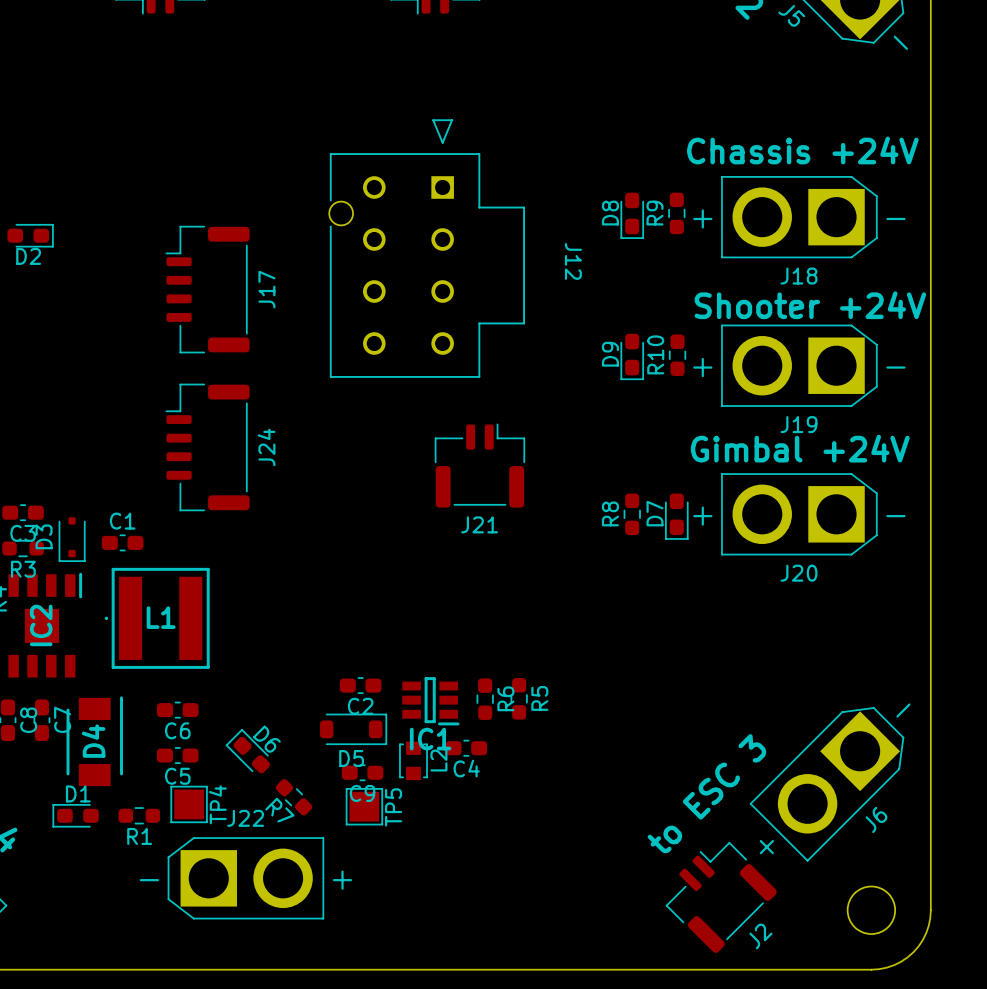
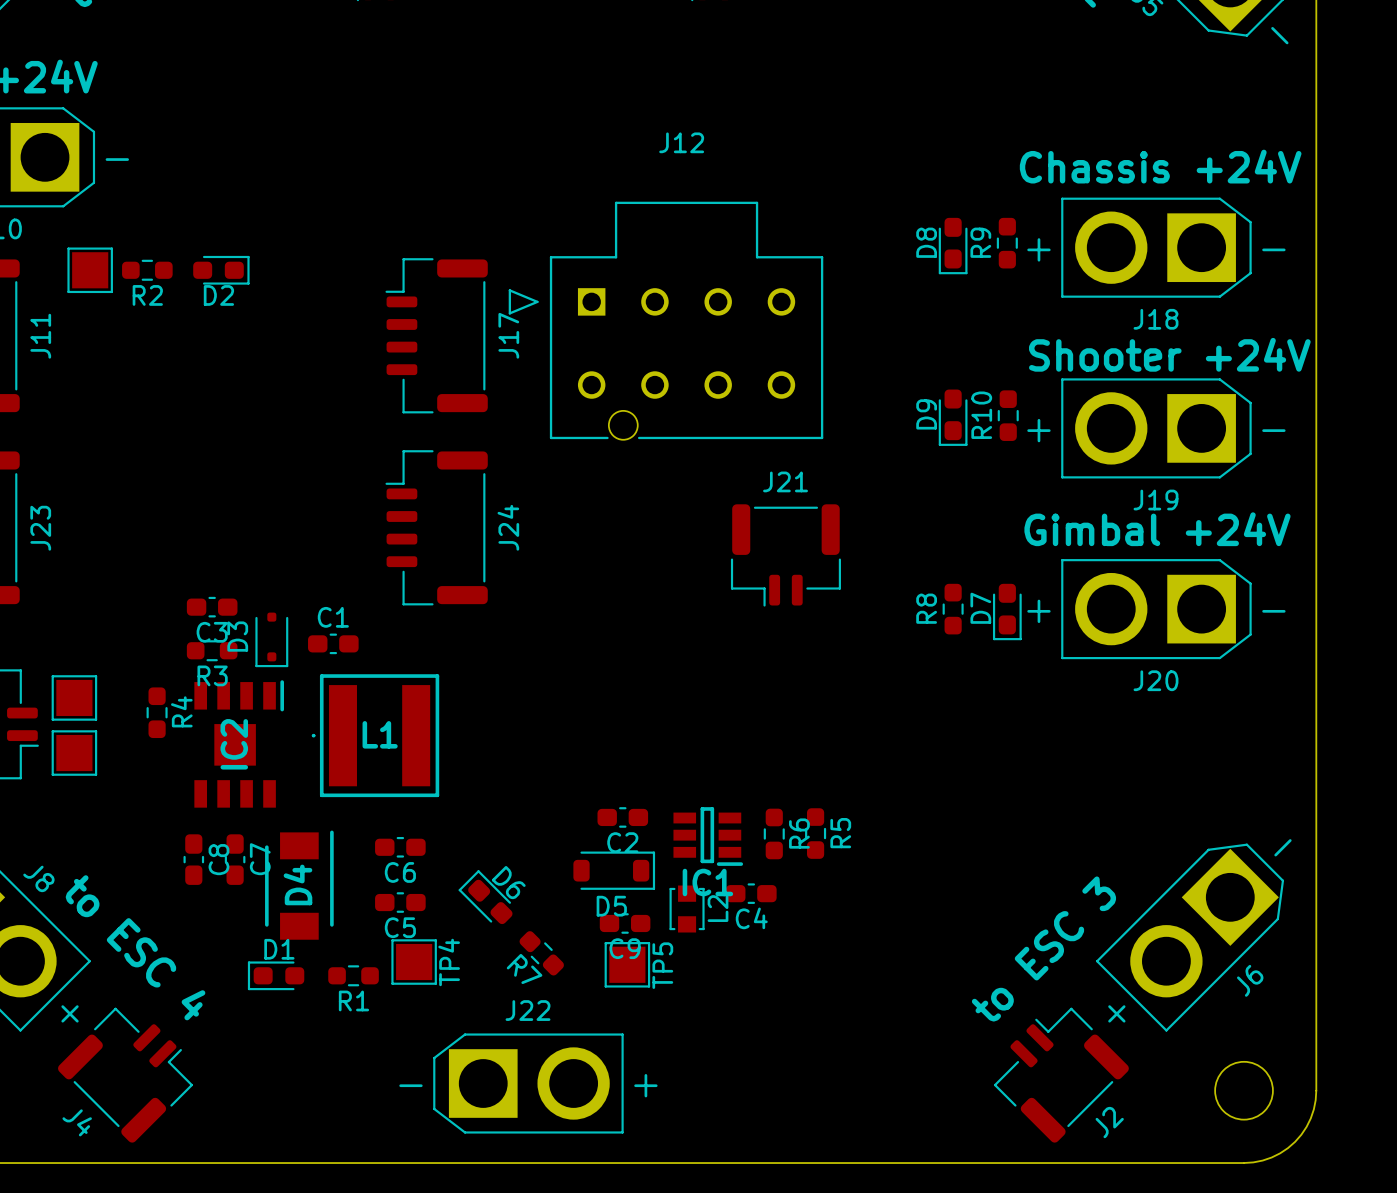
J12 rotation: 0° (427, 248) -> 90° counterclockwise (665, 320)
J21 rotation: 0° (479, 465) -> 180° (785, 555)
J22 position: (245, 878) -> (528, 1083)

